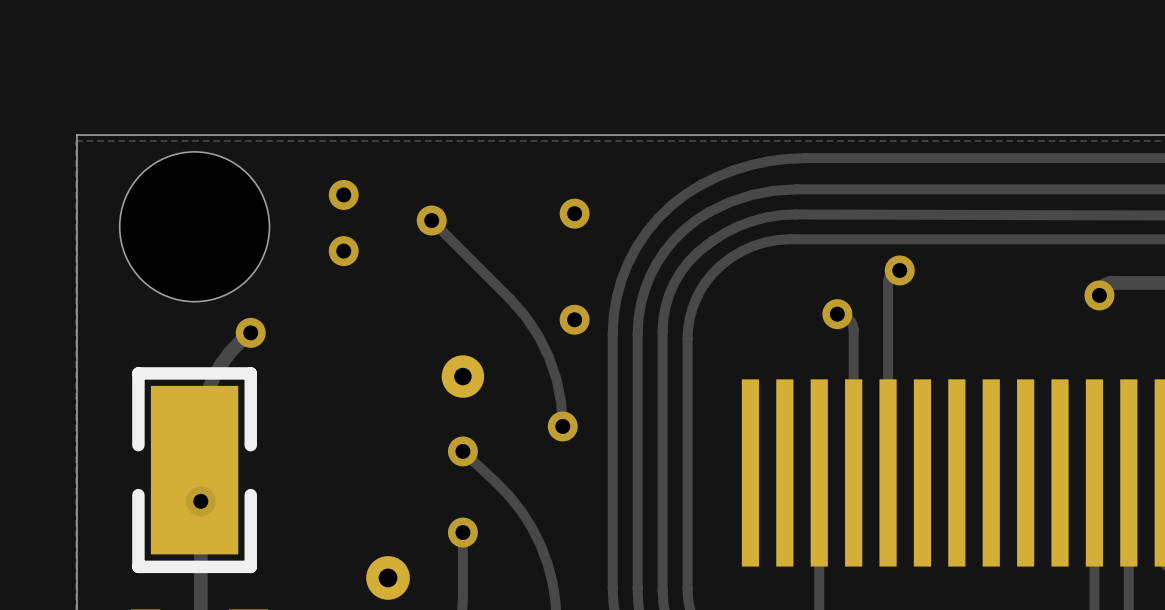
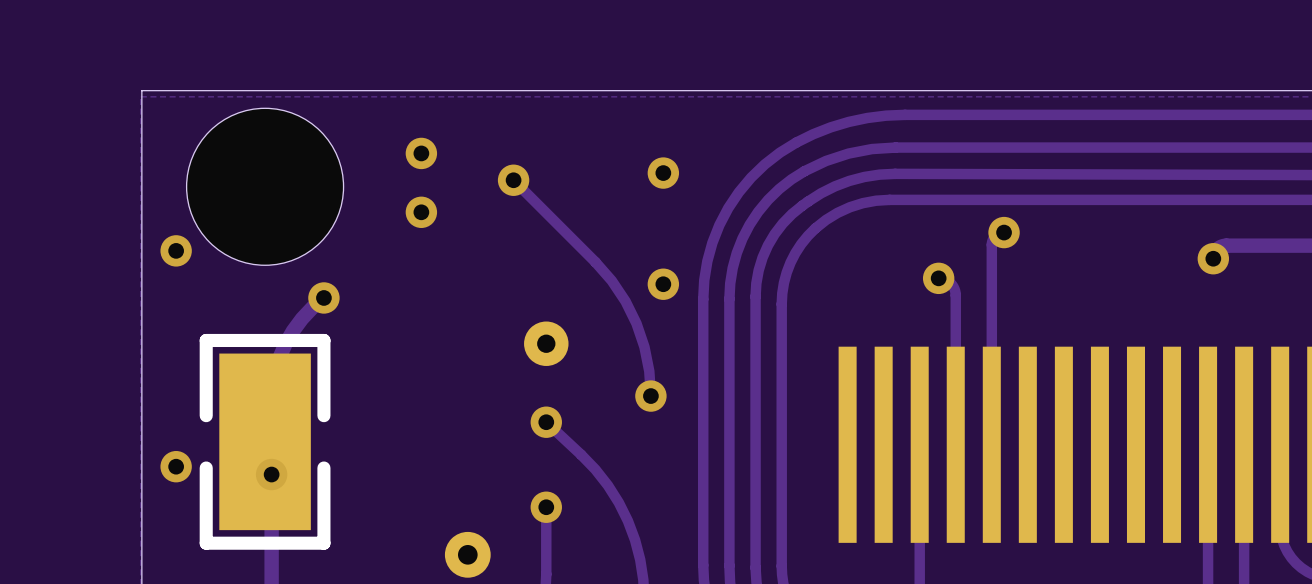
via: none -> (176, 250)
via: none -> (176, 466)

